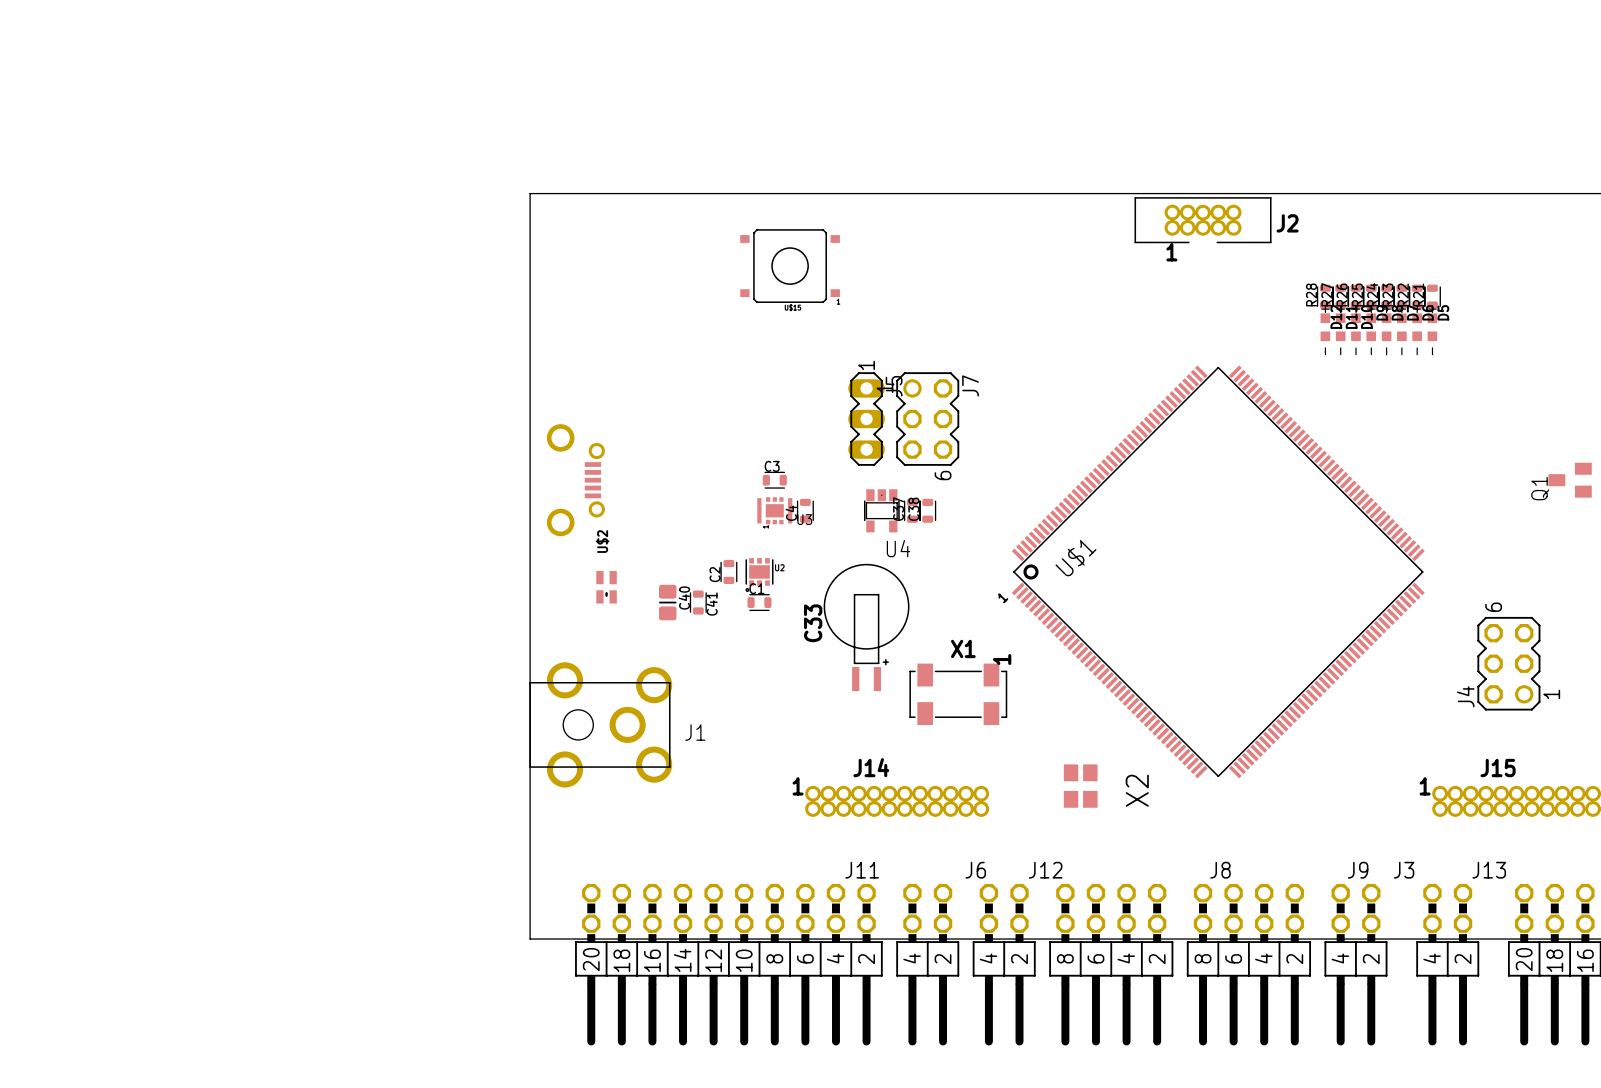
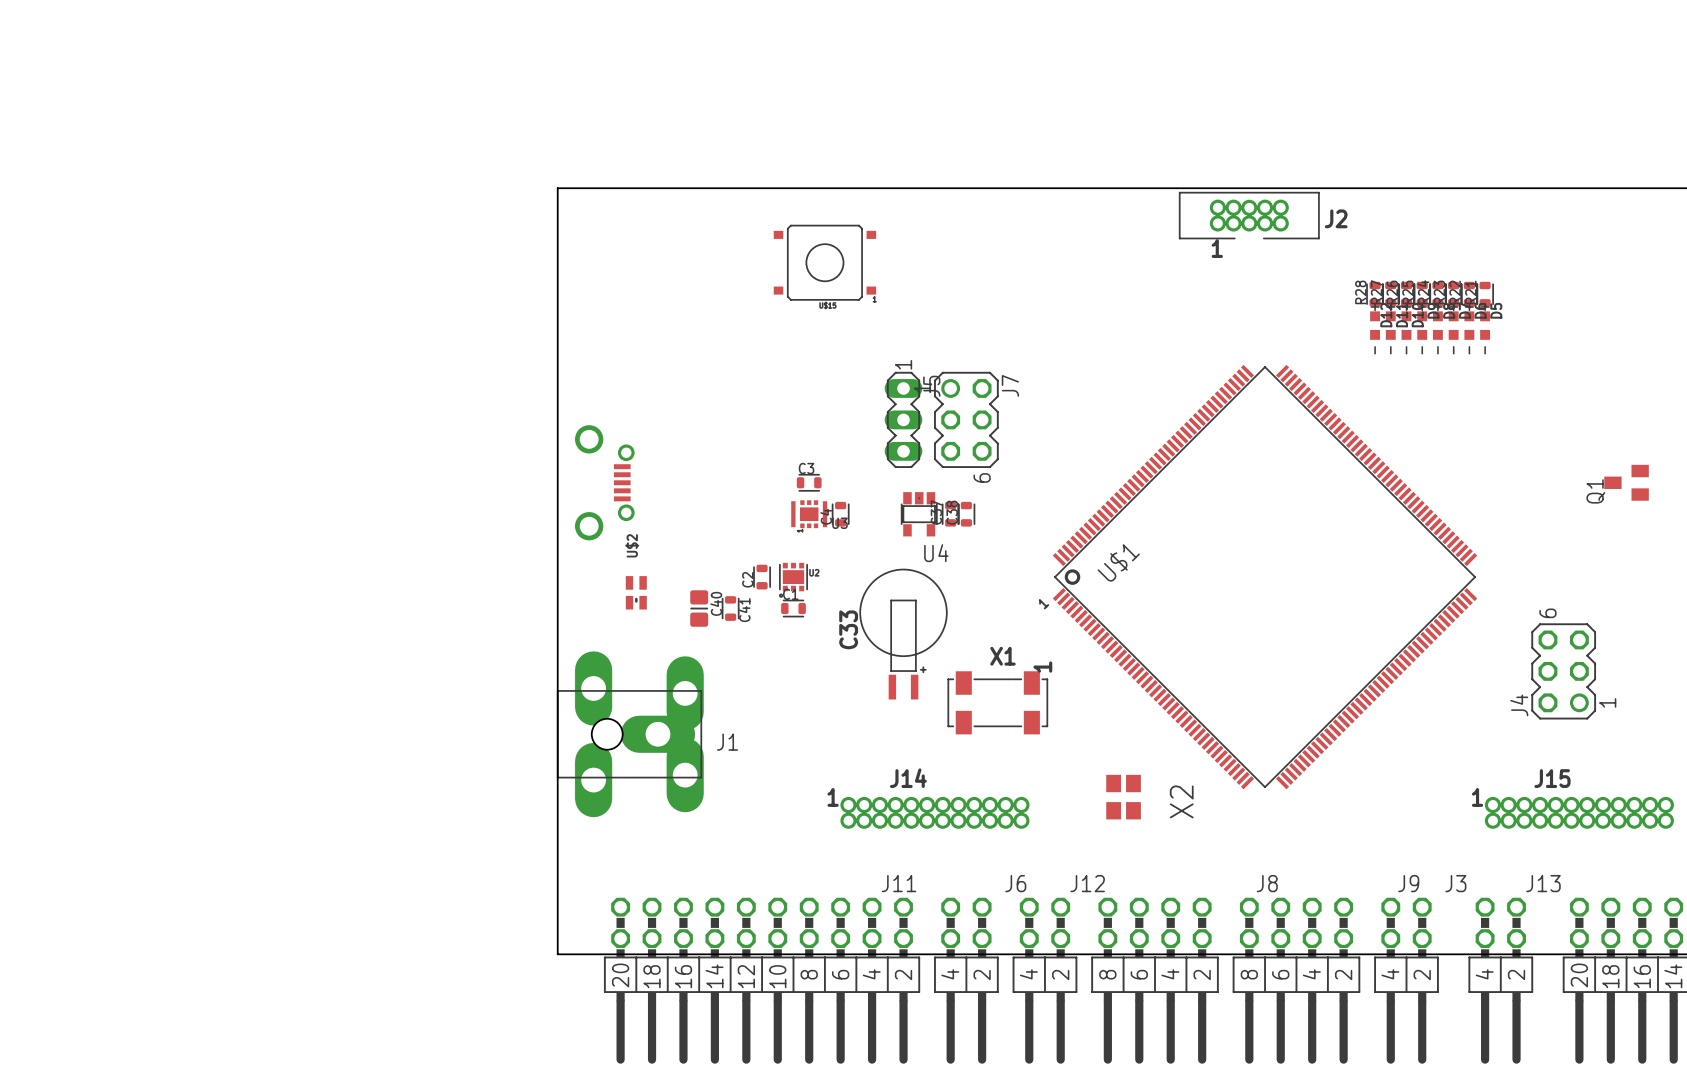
J1 footprint: [529, 662, 673, 788] -> [556, 651, 704, 818]

